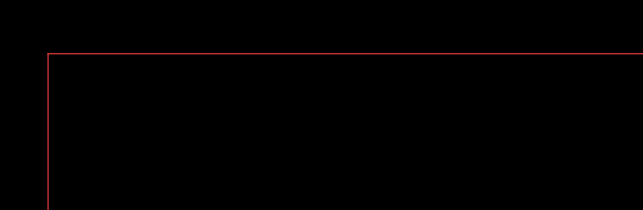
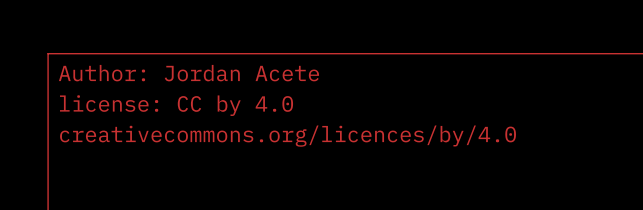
title block: none -> Author: Jordan Acete (188, 73)
title block: none -> license: CC by 4.0 (176, 105)
title block: none -> creativecommons.org/licences/by/4.0 (288, 136)

